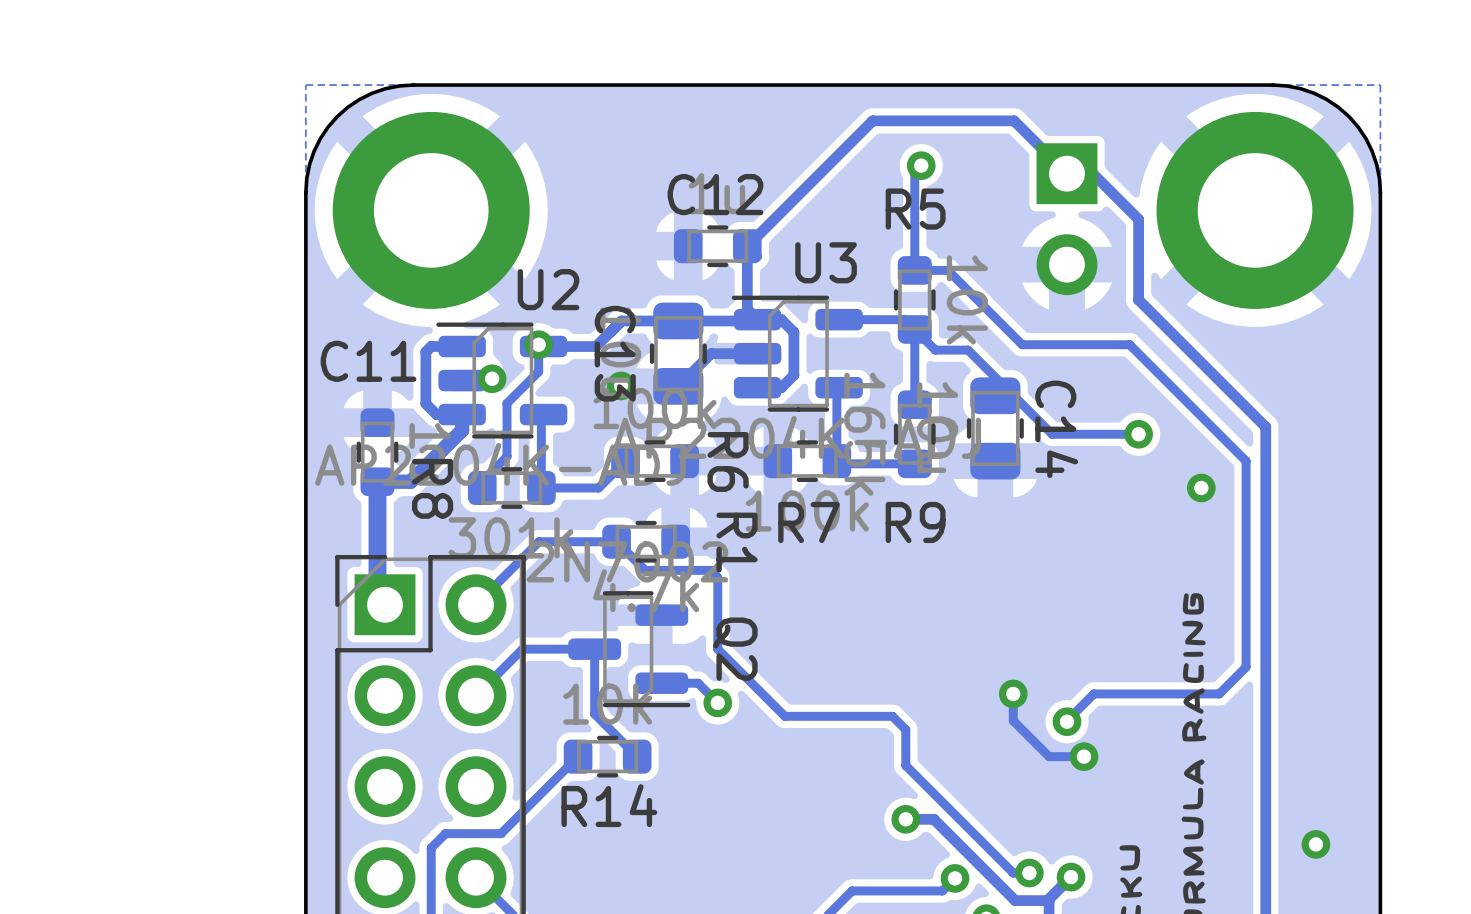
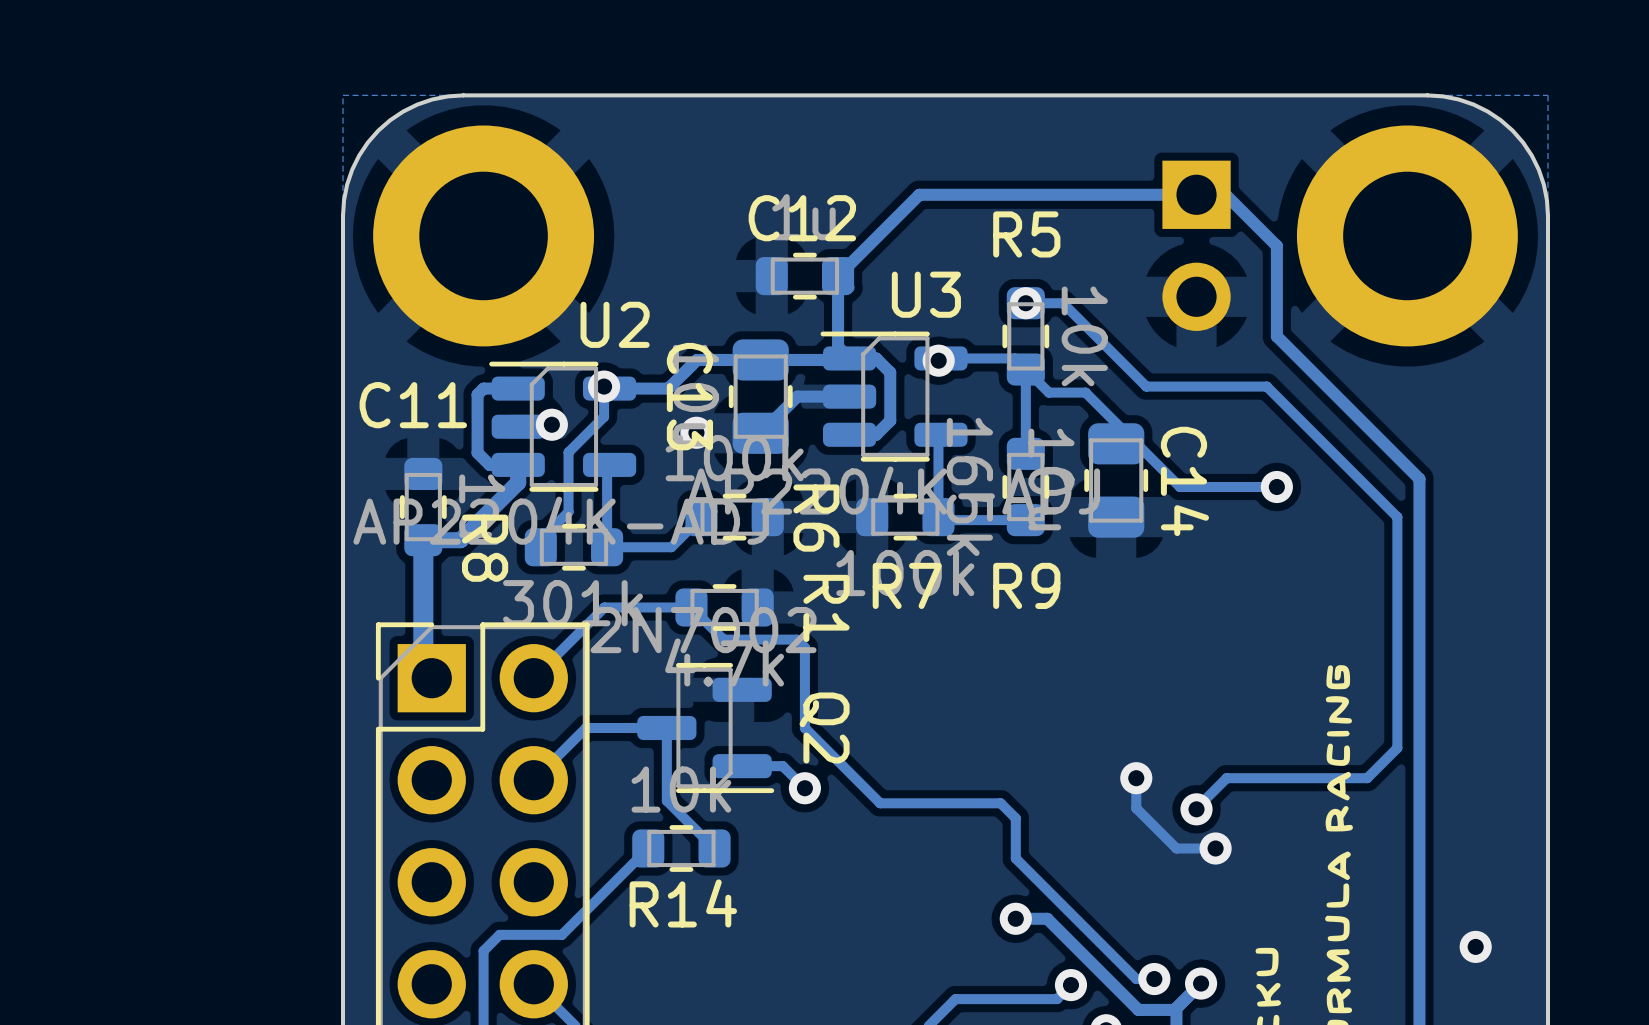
track: (921, 165) (914, 172) (914, 270) -> none
via: (921, 165) -> none
track: (1066, 173) (1014, 120) (872, 120) (819, 173) -> (1196, 194) (919, 194)
via: none -> (1025, 303)
via: none -> (938, 360)
via: (1201, 487) -> none

